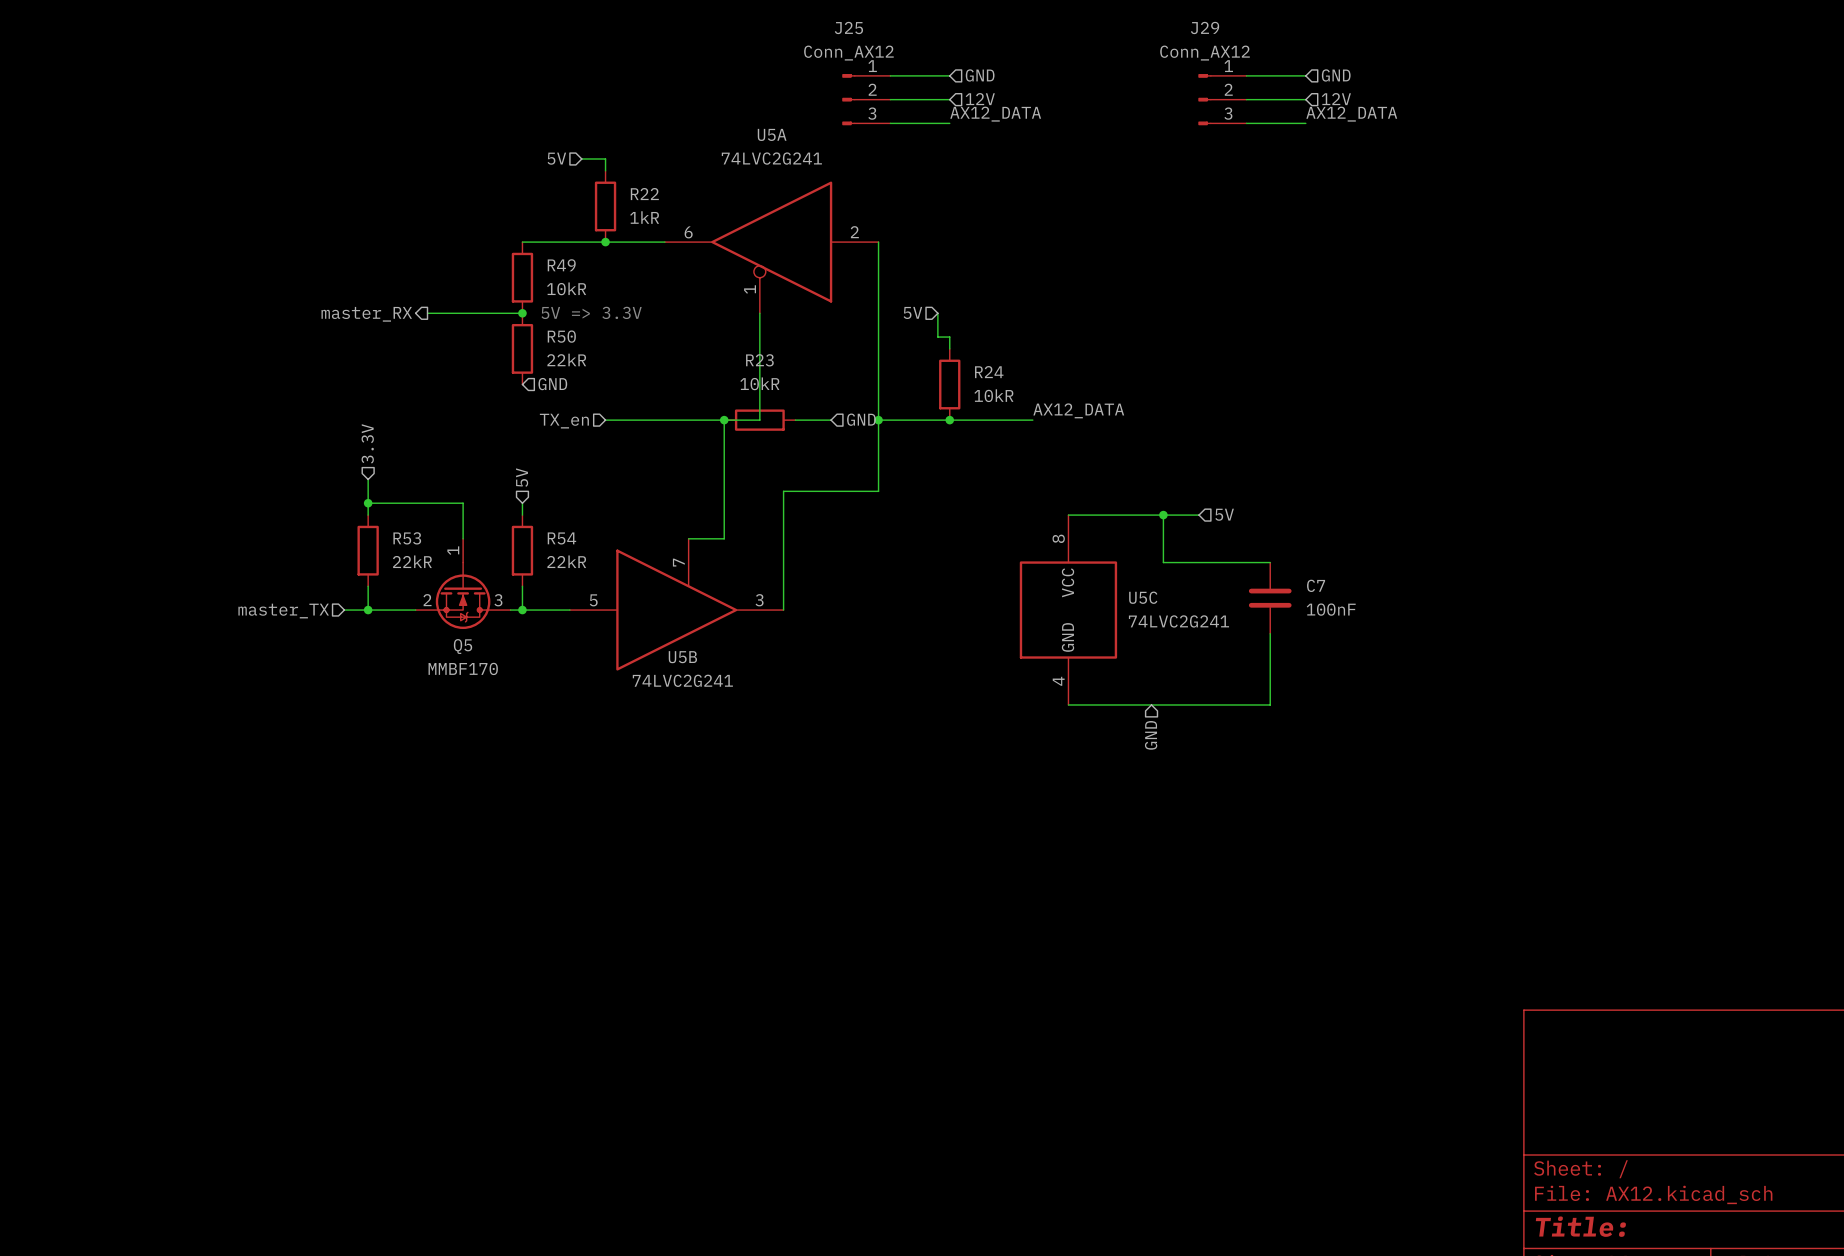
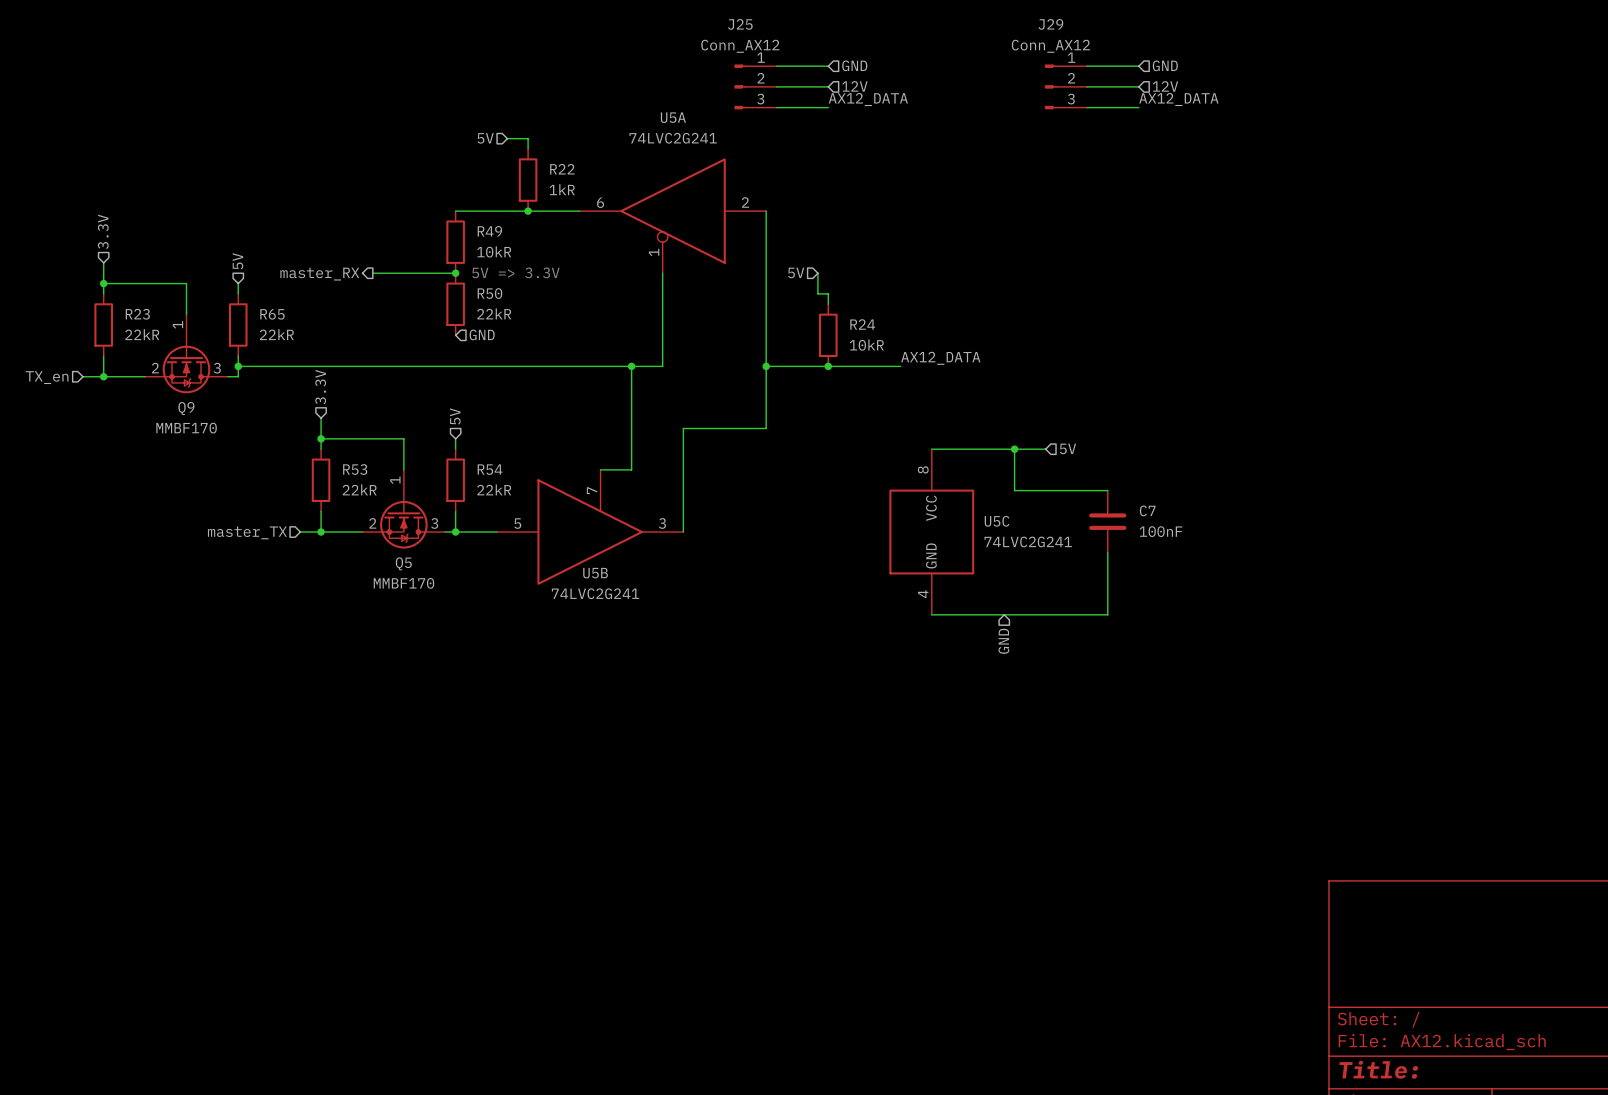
hierarchical label: none -> 3.3V (103, 231)
hierarchical label: none -> 5V (237, 261)
wire: none -> (103, 262) (103, 293)
wire: none -> (103, 283) (186, 283) (186, 314)
junction: none -> (103, 283)
wire: none -> (238, 283) (238, 293)
R23 name position: R23 (759, 360) -> R23 (137, 314)
R65: none -> 22kR (238, 324)
R23 value: 10kR (759, 383) -> 22kR (142, 334)
Q9: none -> MMBF170 (186, 353)
wire: none -> (103, 356) (103, 376)
wire: none -> (238, 356) (238, 376) (227, 376)
hierarchical label: GND (861, 419) -> none
wire: none -> (238, 366) (528, 366)
junction: none -> (238, 366)
R23 rotation: 0° (759, 420) -> 90° clockwise (103, 324)
R23 position: (759, 420) -> (103, 324)
wire: (795, 420) (831, 420) -> none
hierarchical label: TX_en (564, 421) -> none
wire: none -> (82, 376) (145, 376)
junction: none -> (103, 376)
hierarchical label: none -> TX_en (47, 377)

